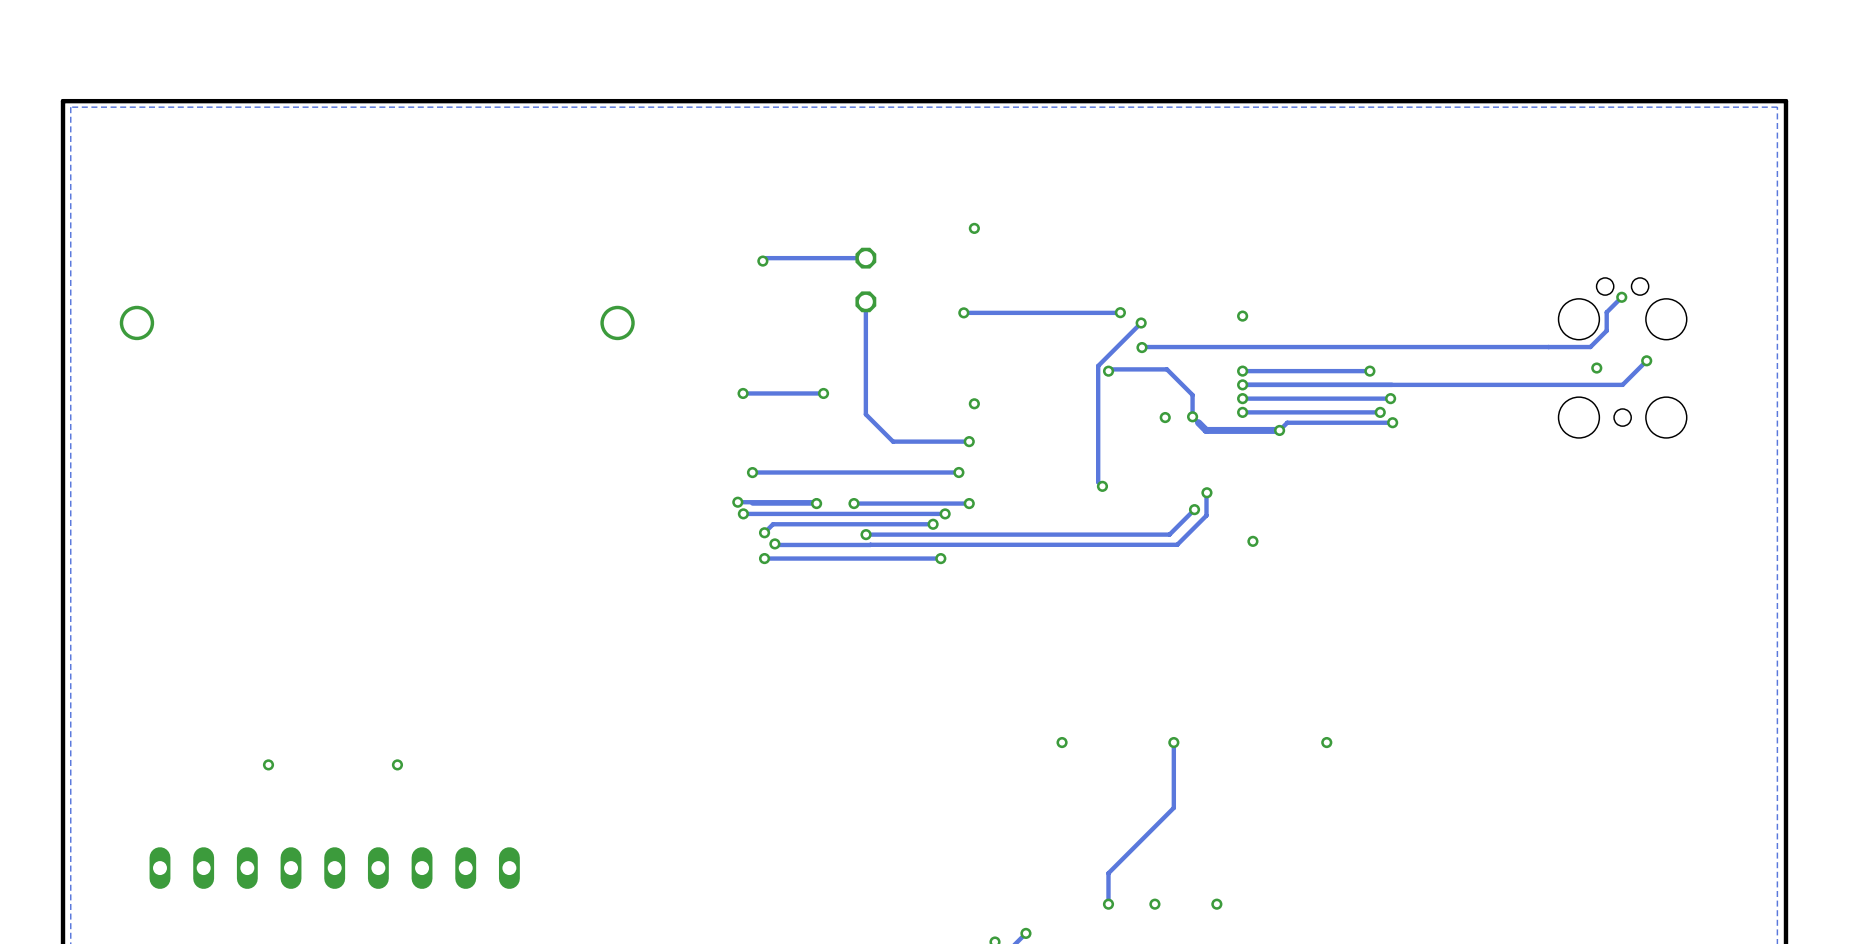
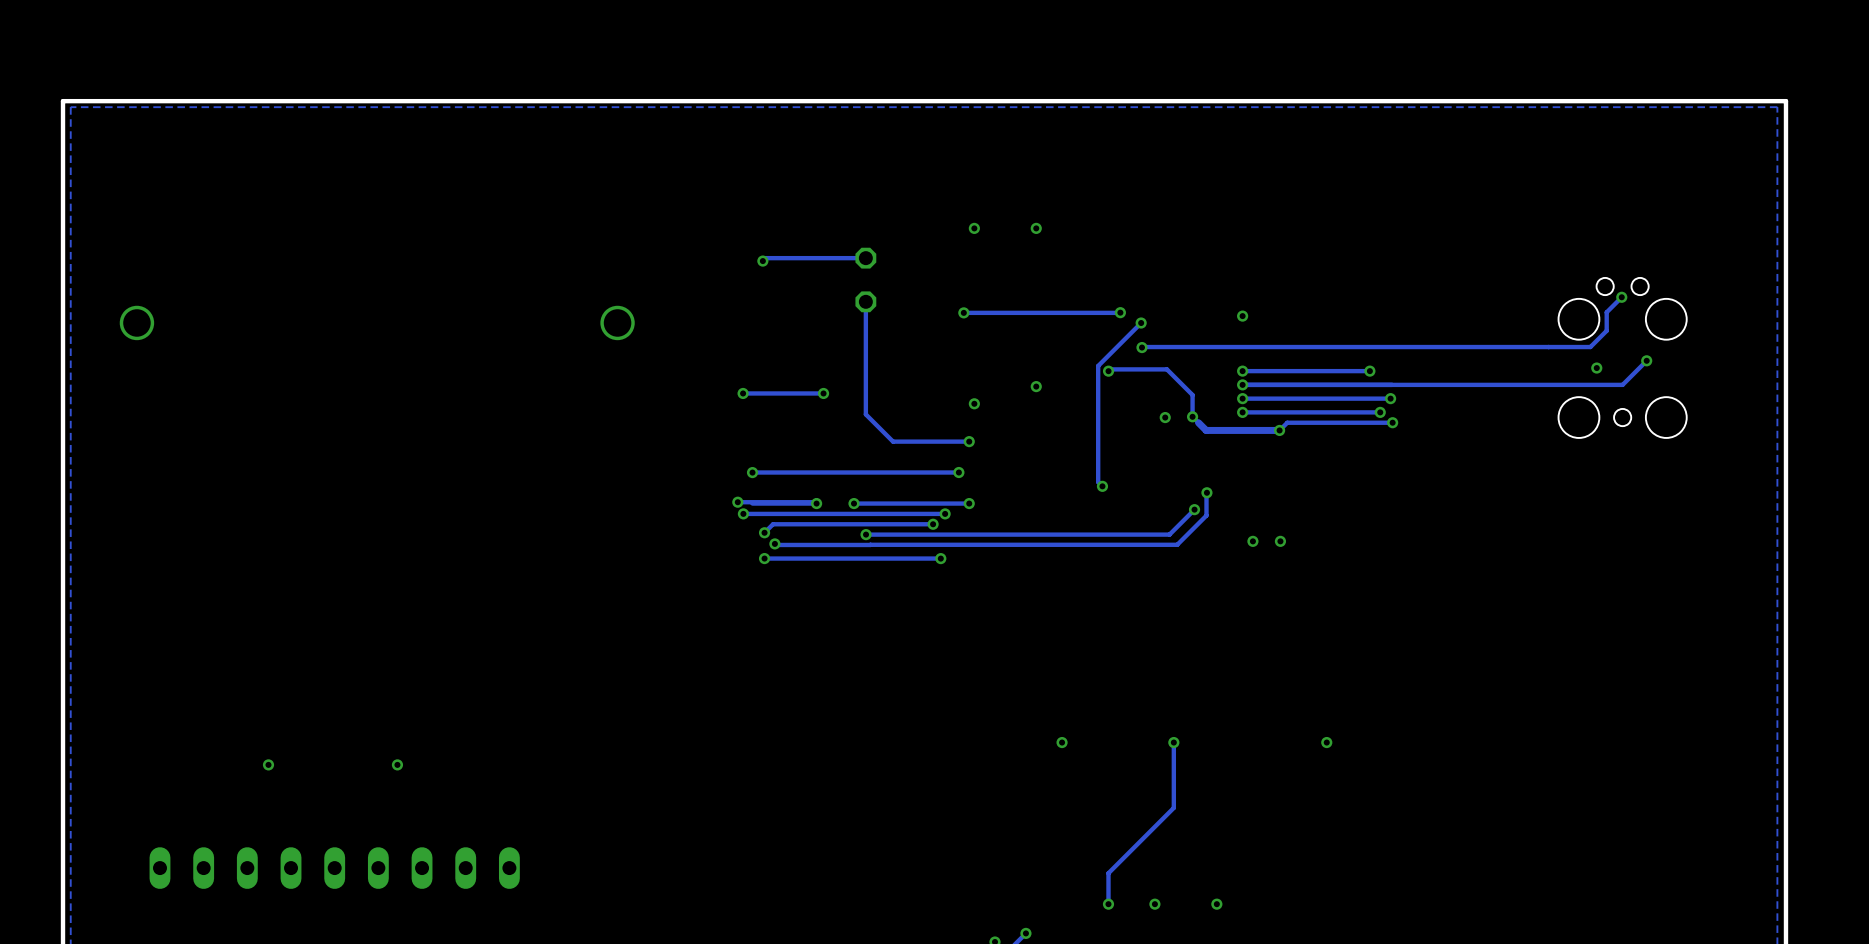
via: none -> (1036, 228)
via: none -> (1036, 386)
via: none -> (1280, 541)

